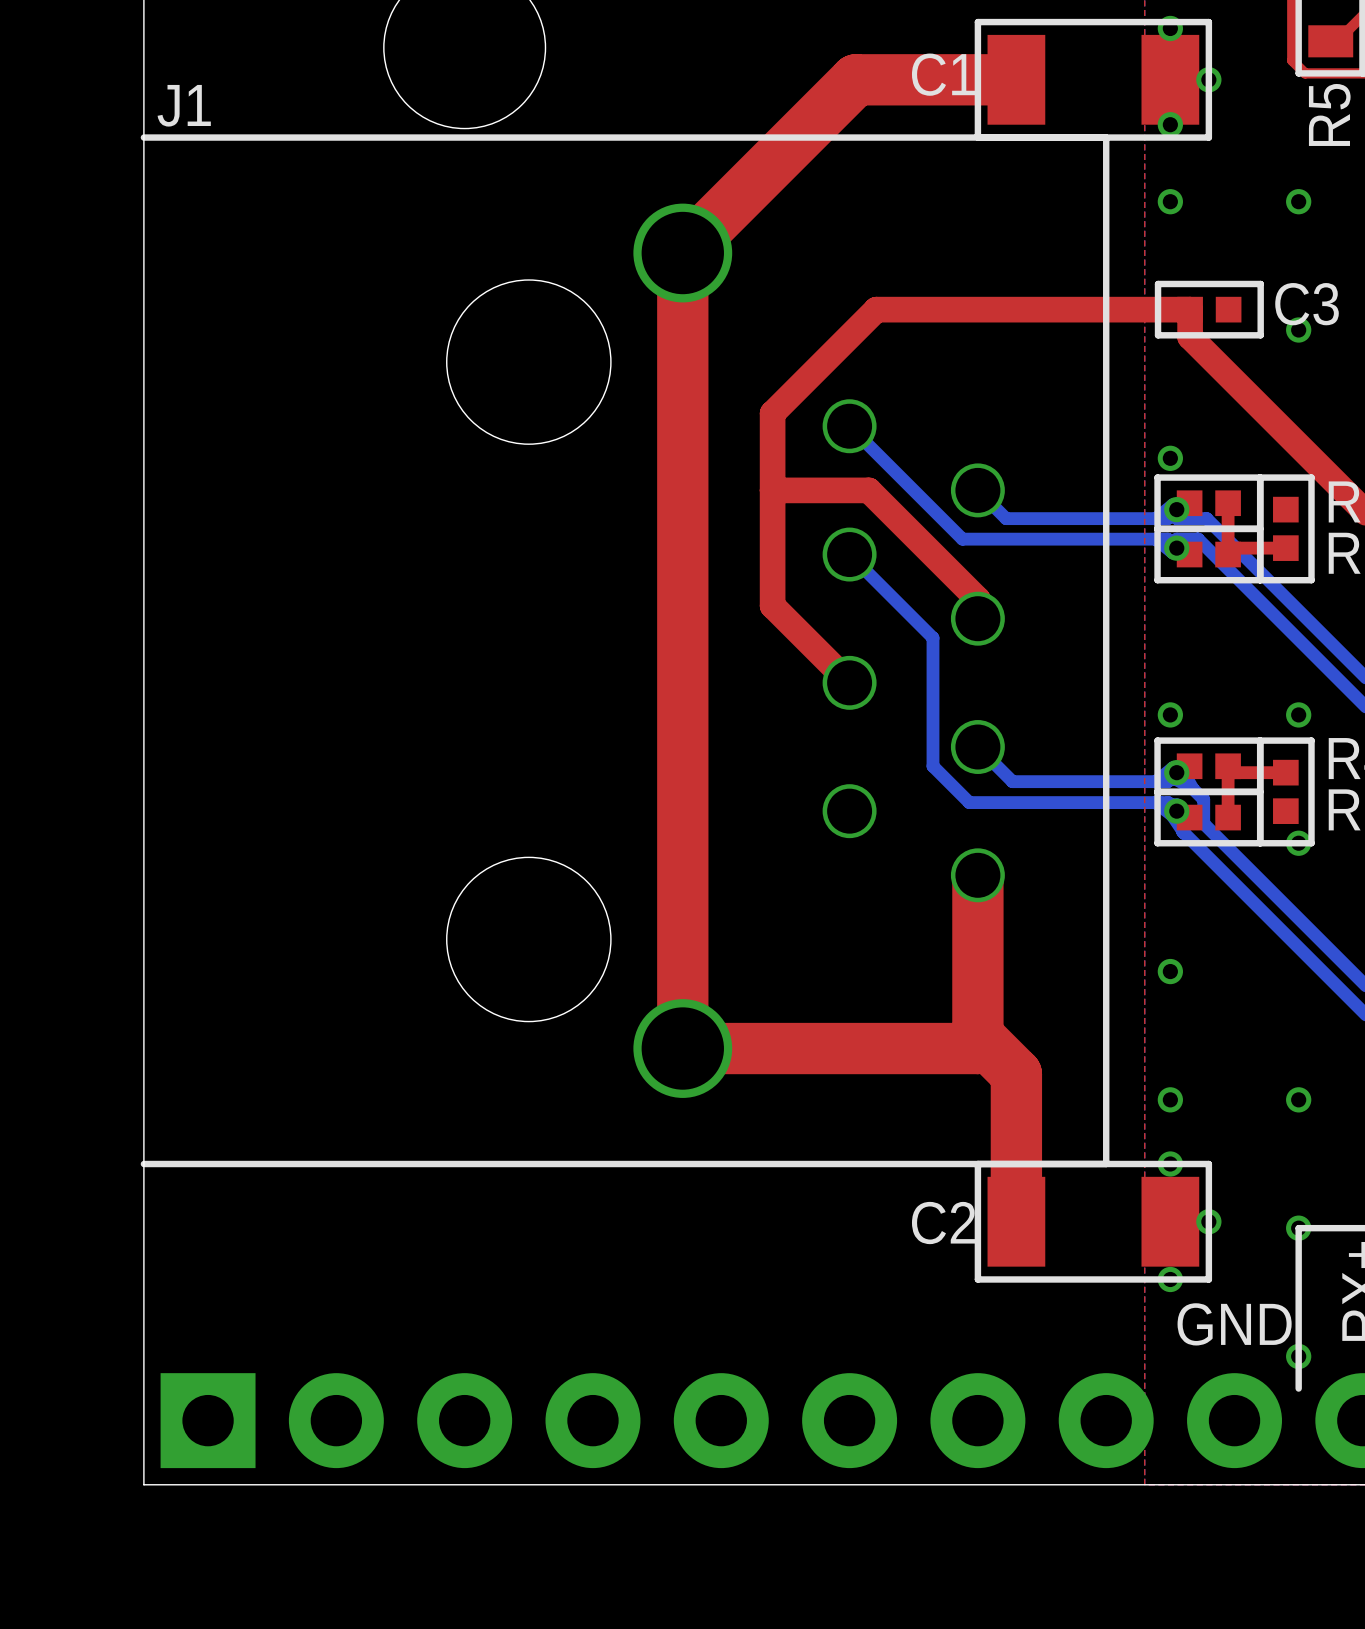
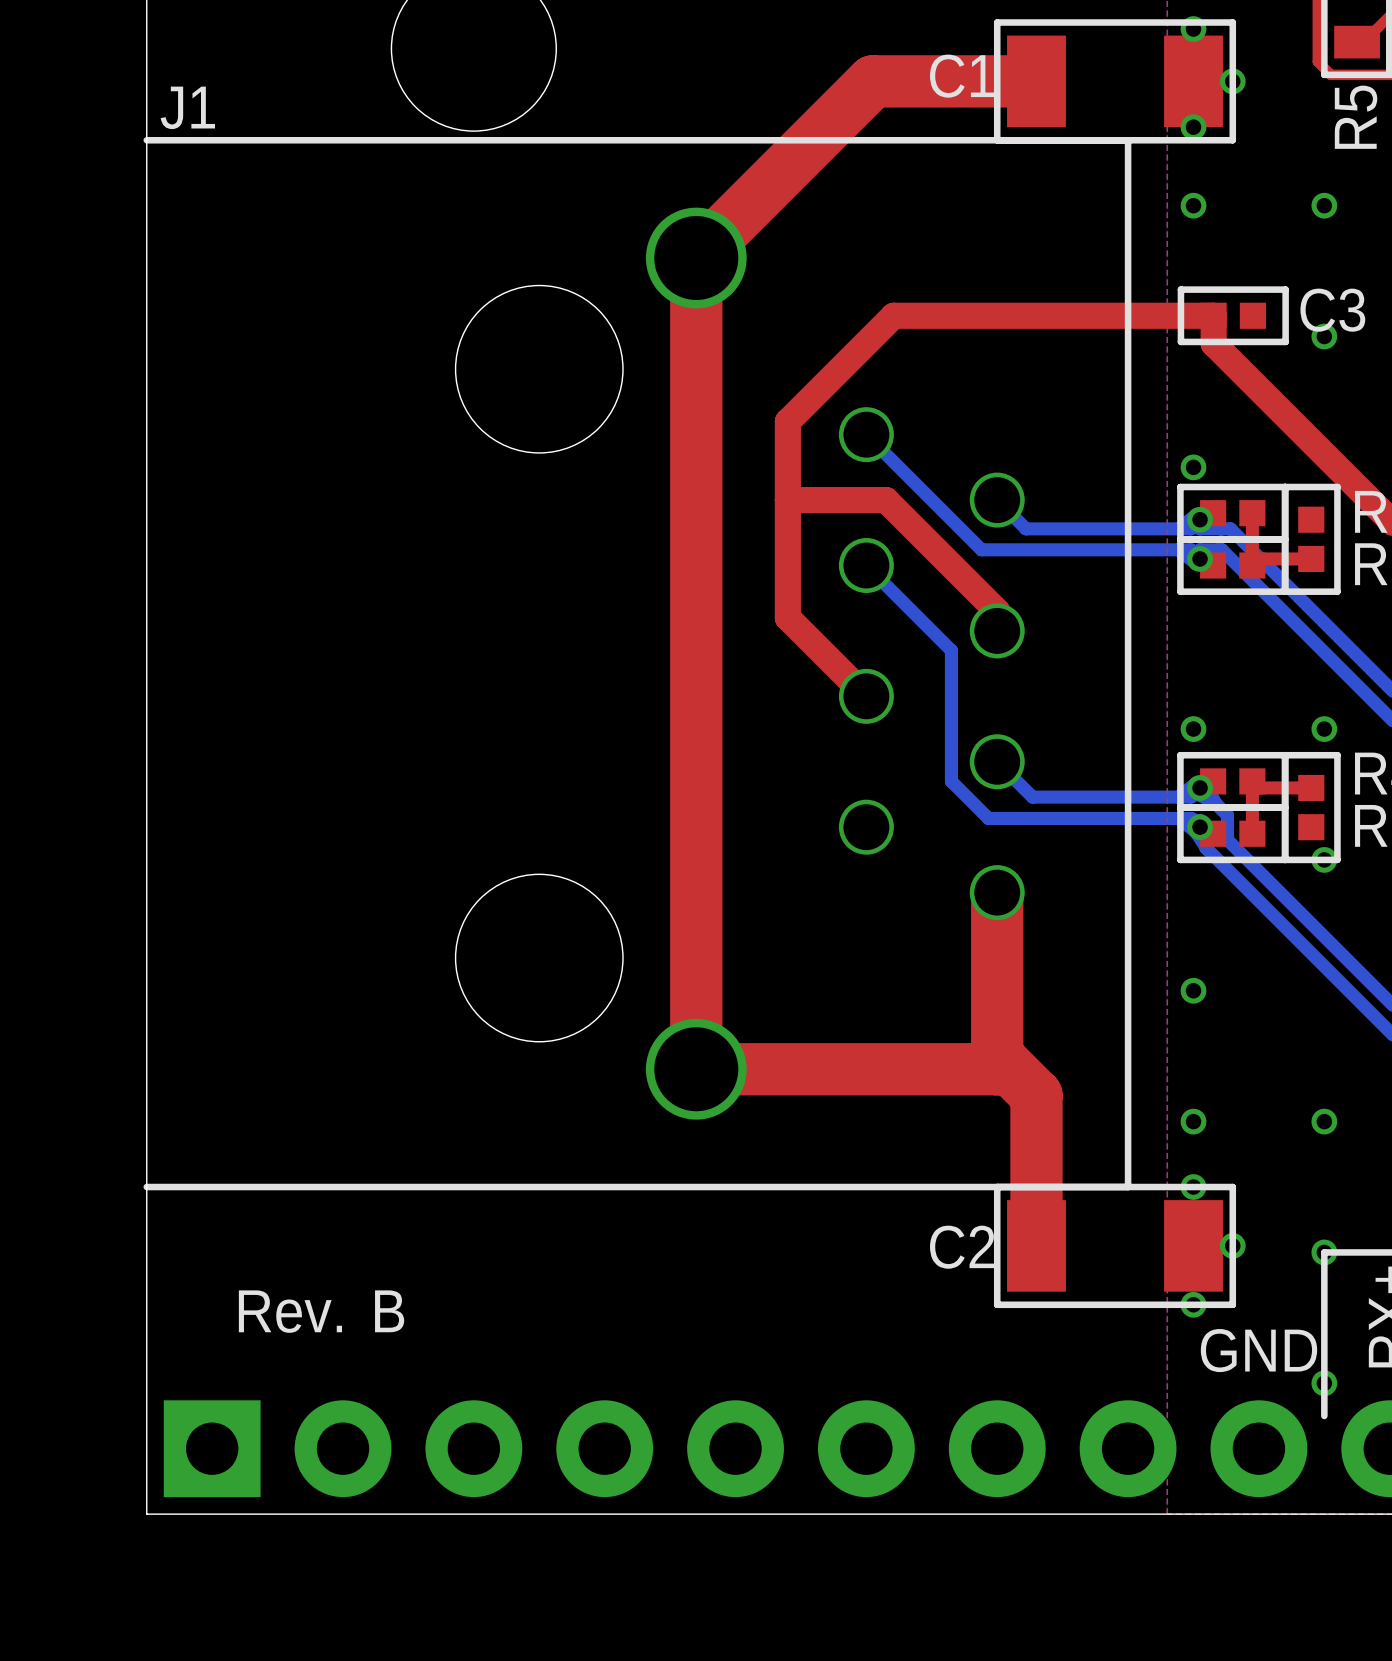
text: none -> B (389, 1311)
text: none -> Rev. (290, 1311)

